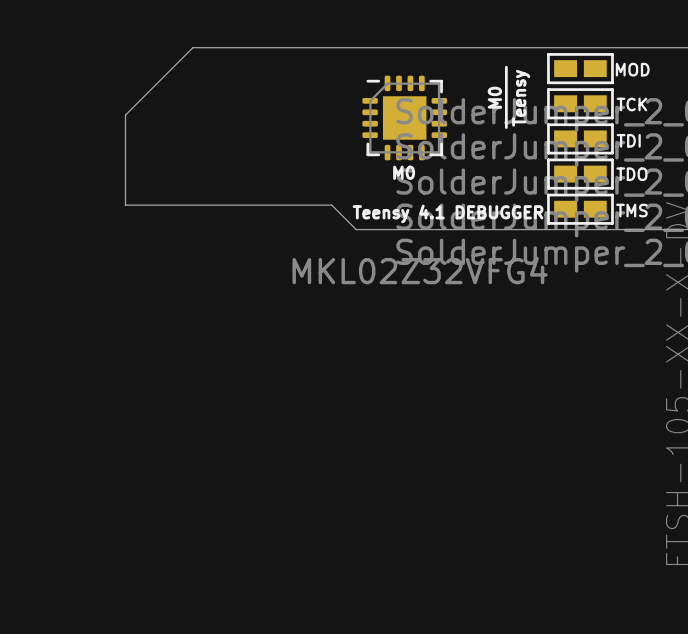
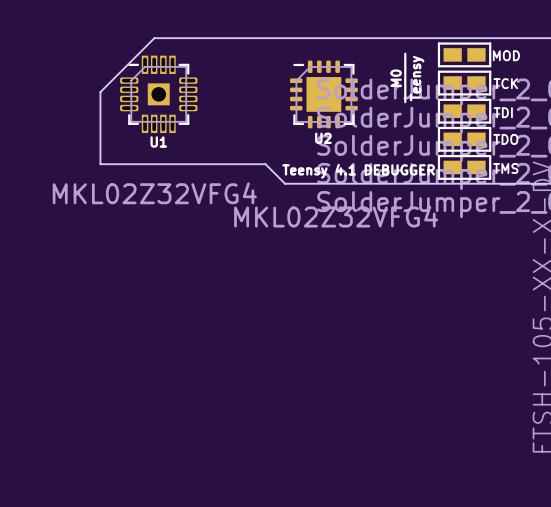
U1: none -> MKL02Z32VFG4 (158, 94)
M0 name: M0 (404, 172) -> U2 (323, 138)

